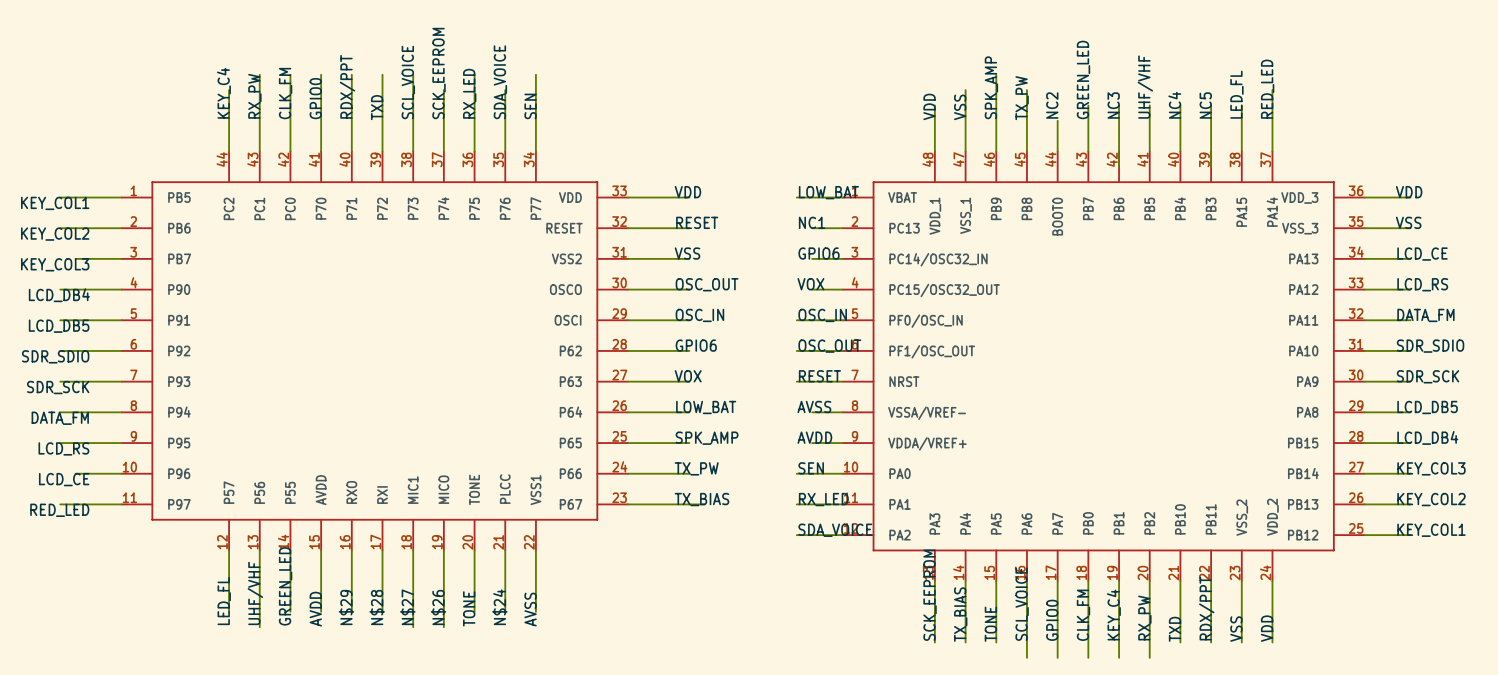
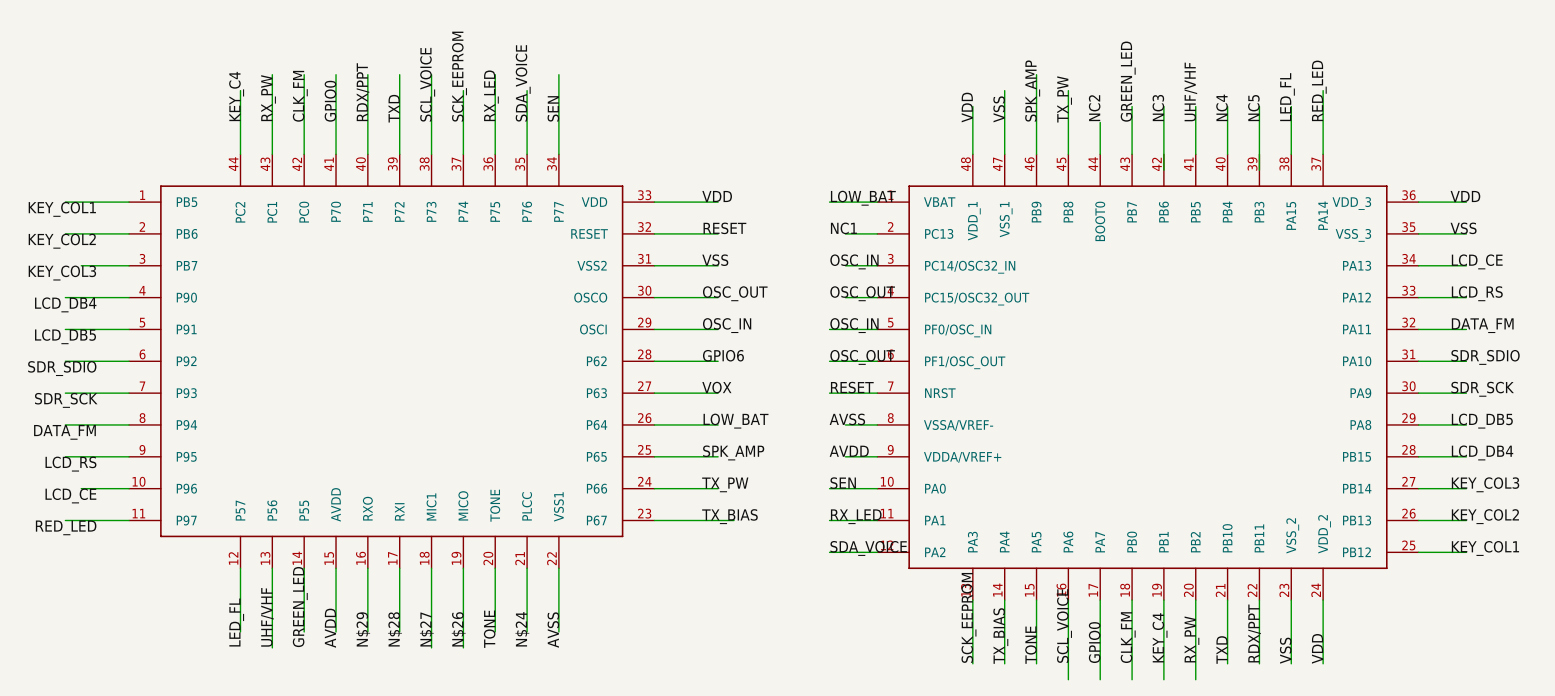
label: GPIO6 (819, 253) -> OSC_IN (854, 261)
label: VOX (810, 284) -> OSC_OUT (862, 293)

